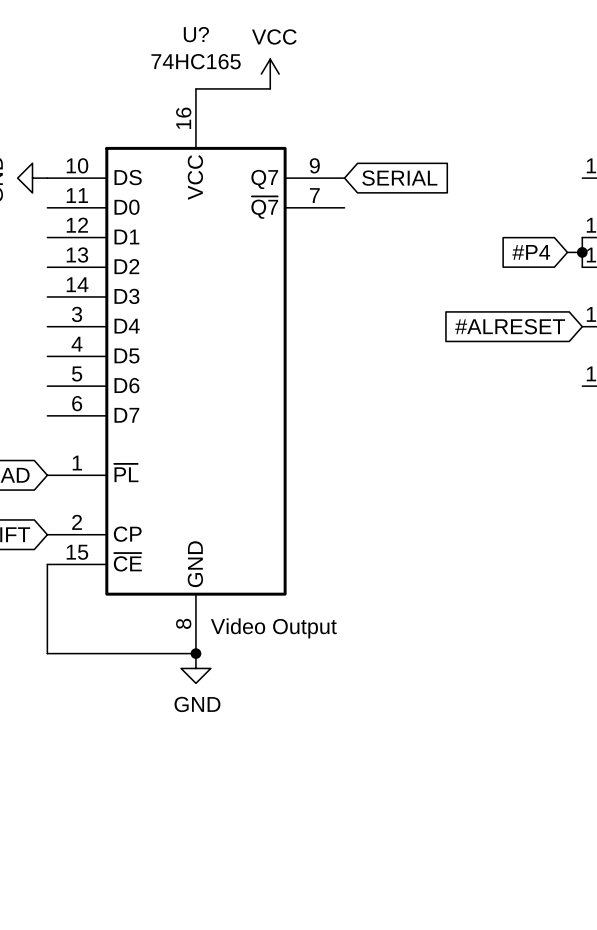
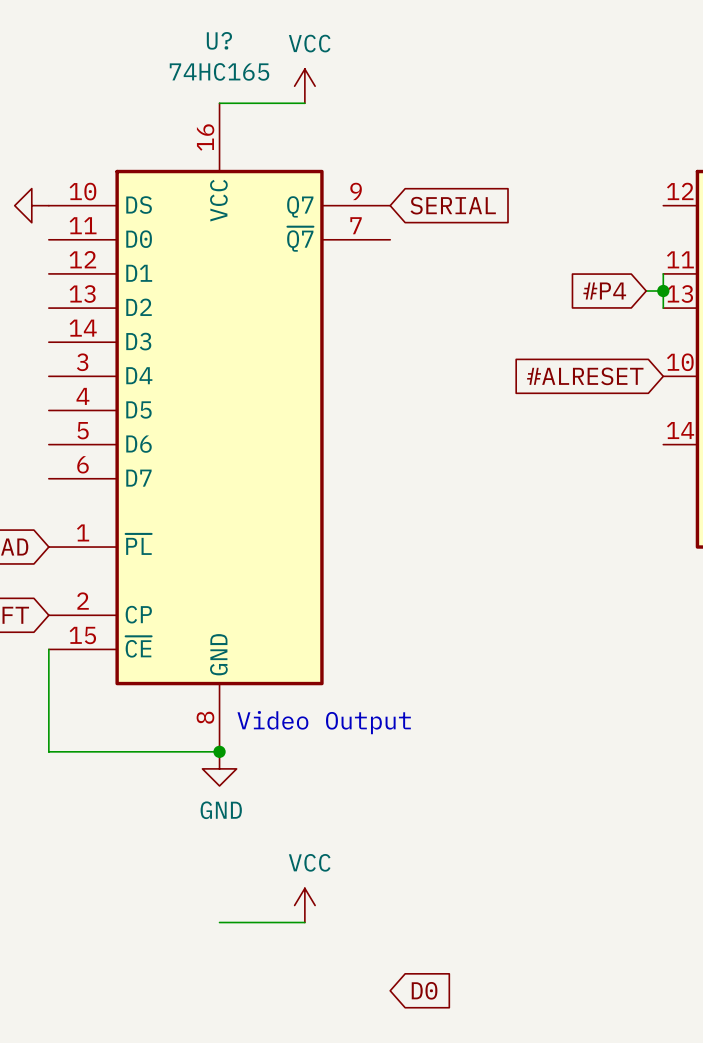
power symbol: none -> VCC (304, 905)
wire: none -> (219, 922) (304, 922)
global label: none -> D0 (424, 990)

